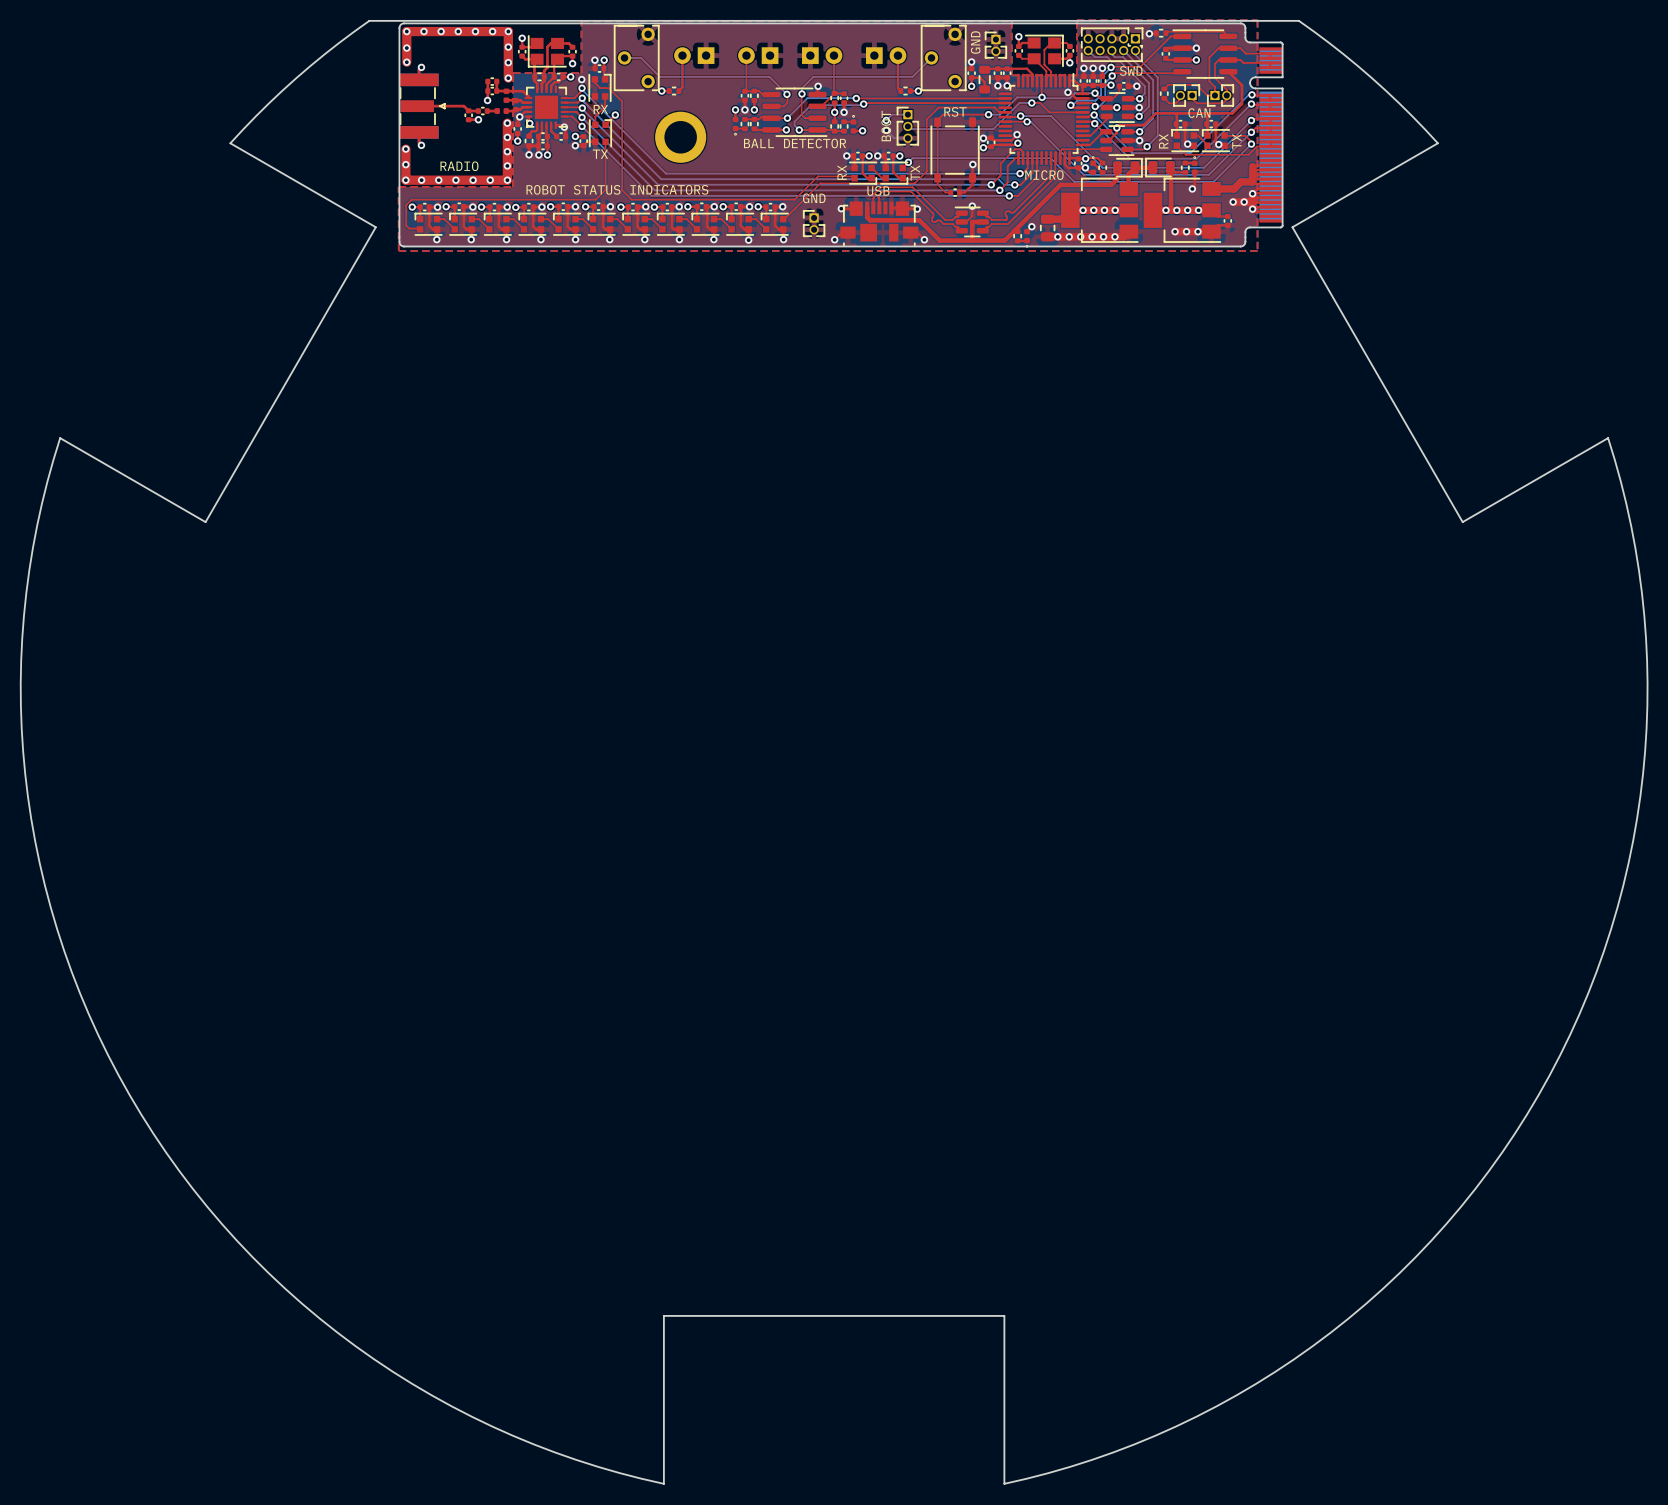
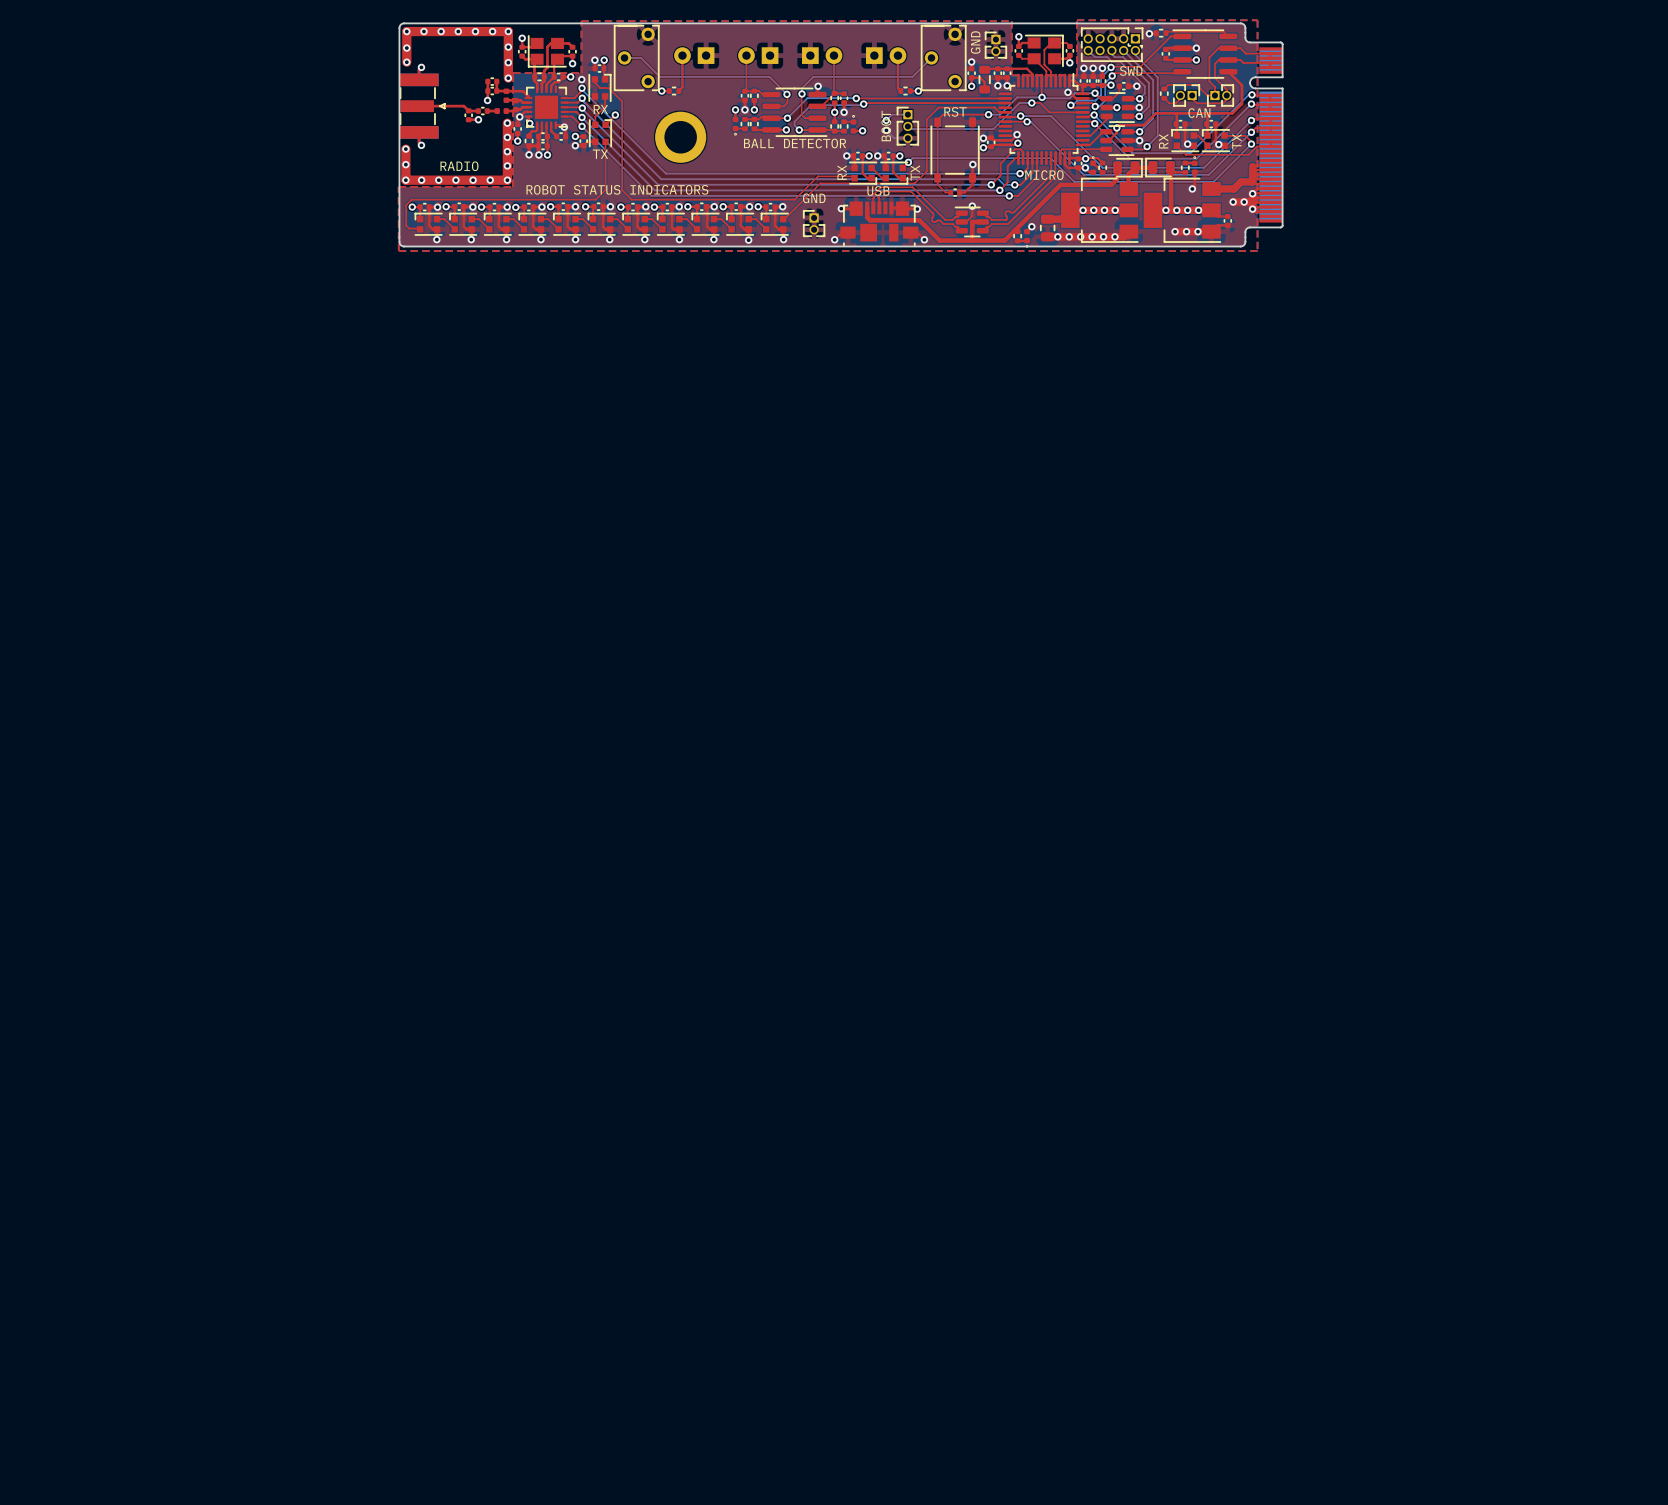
board edge: (369, 20) (1298, 20) (1371, 78) (1437, 143) (1292, 227) (1462, 522) (1608, 438) (1626, 503) (1641, 592) (1647, 683) (1643, 774) (1628, 863) (1604, 950) (1570, 1034) (1538, 1095) (1488, 1171) (1431, 1240) (1366, 1303) (1294, 1359) (1236, 1395) (1155, 1435) (1091, 1459) (1004, 1483) (1004, 1315) (663, 1315) (663, 1483) (598, 1466) (533, 1444) (471, 1416) (392, 1371) (337, 1332) (268, 1273) (221, 1224) (166, 1152) (129, 1095) (88, 1014) (64, 950) (39, 863) (25, 774) (20, 706) (23, 615) (32, 548) (47, 481) (60, 438) (205, 522) (375, 227) (230, 143) (296, 78) (369, 20) -> none

